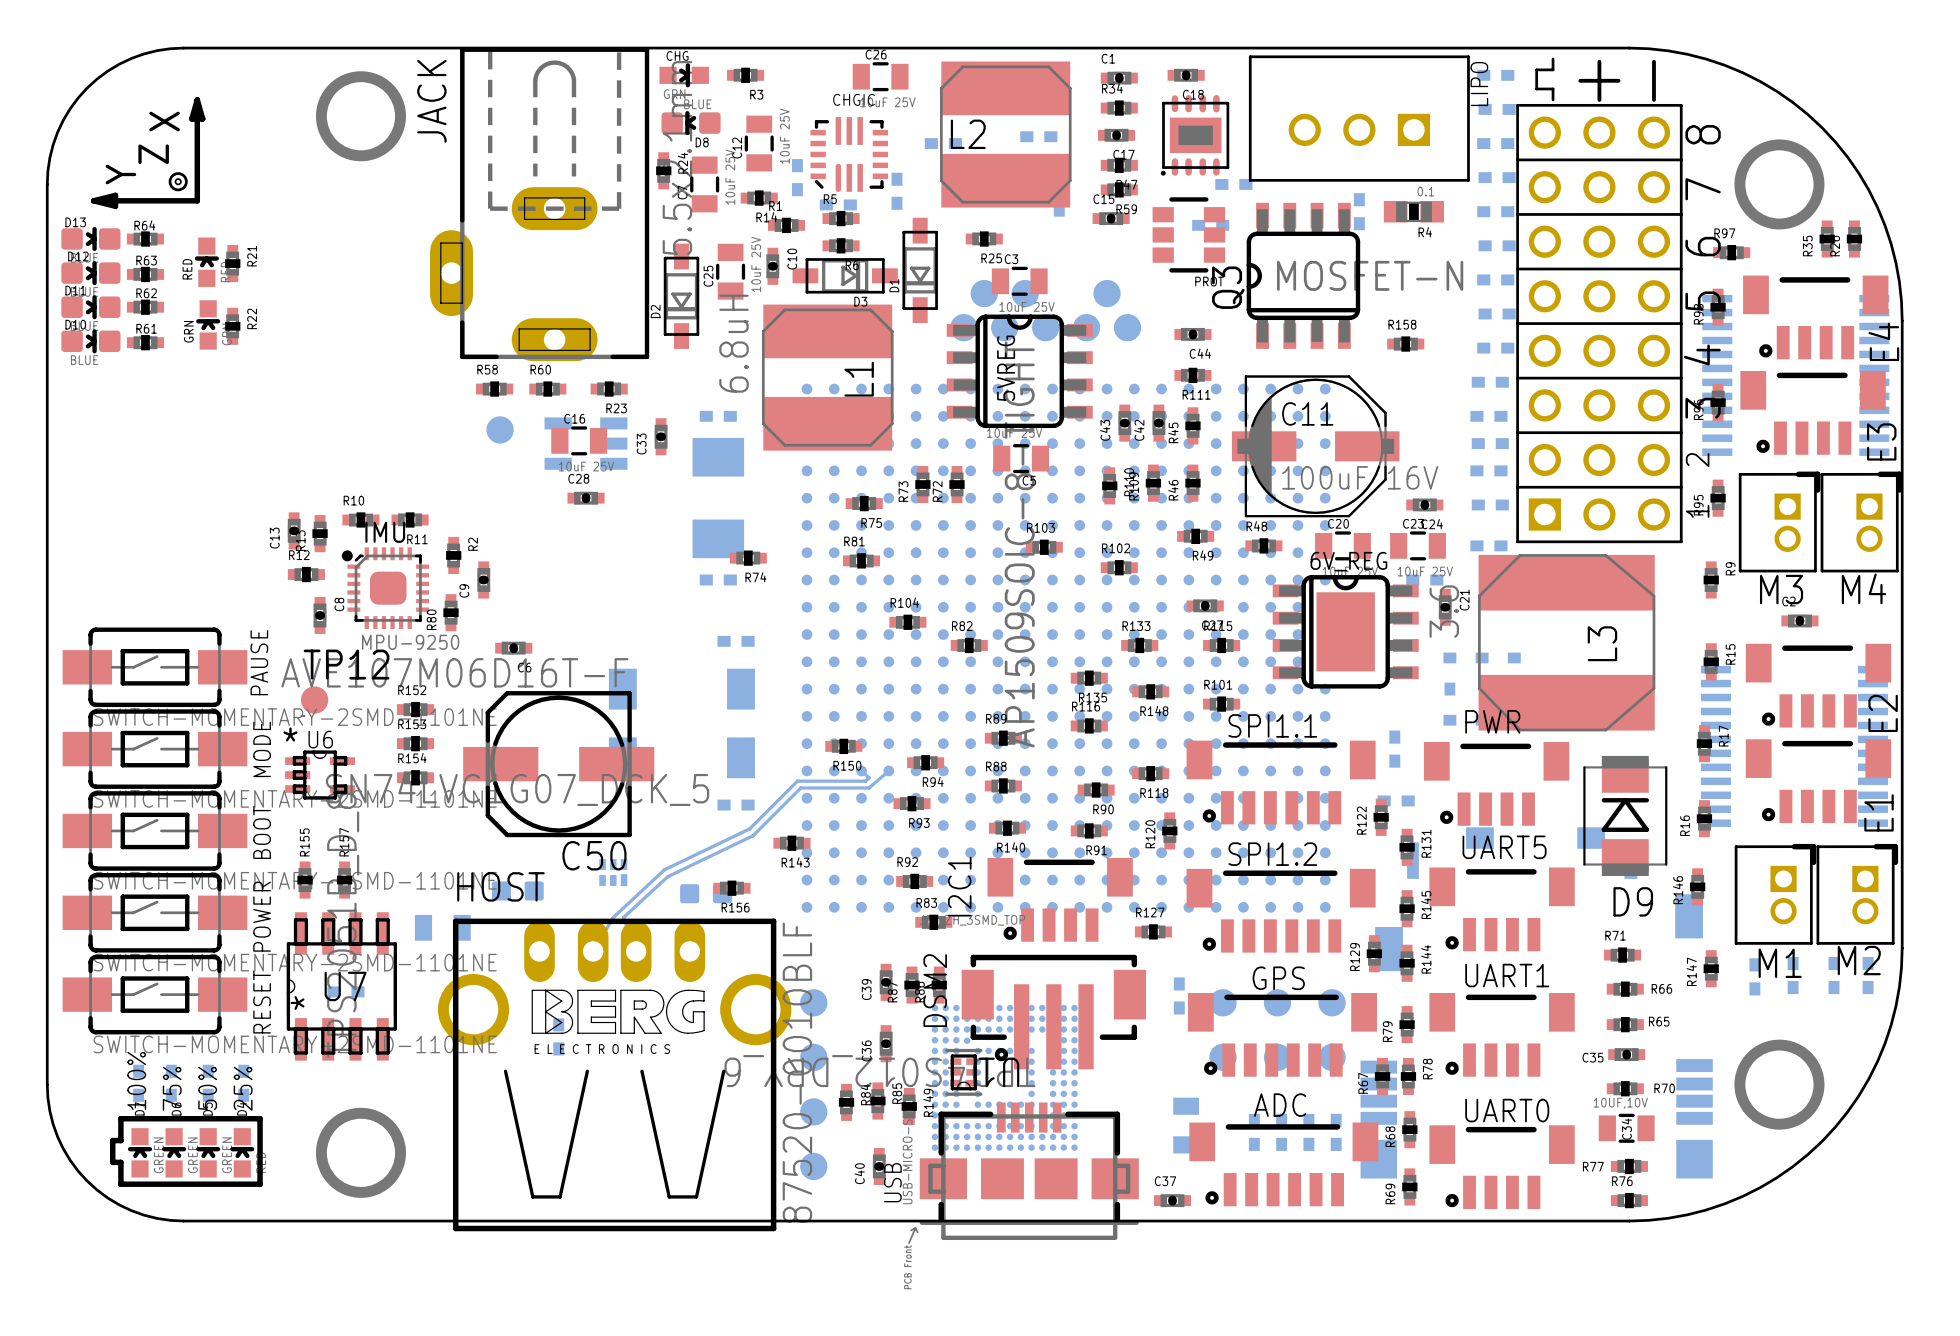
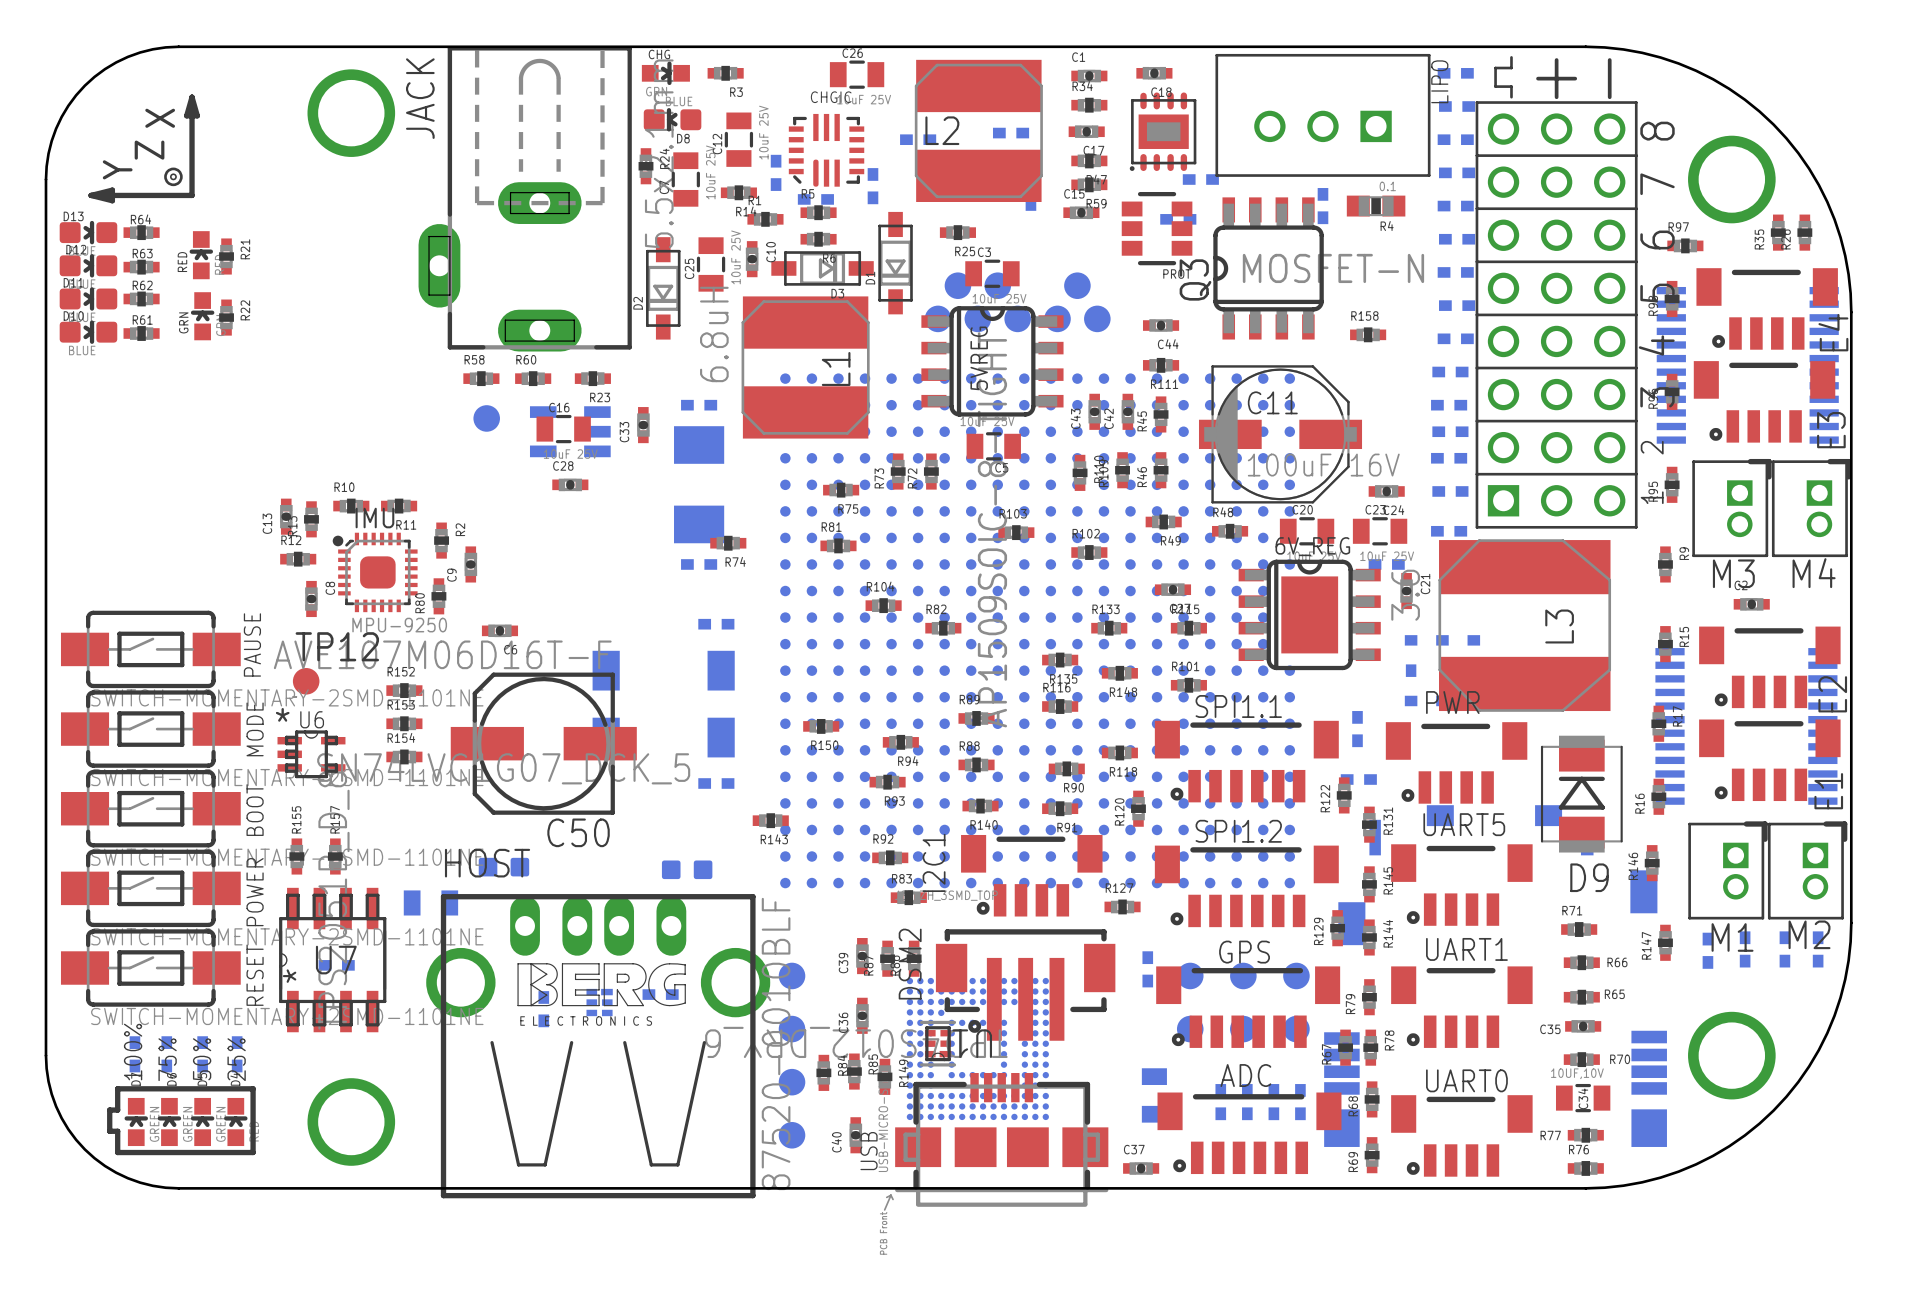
bottom track: (861, 770) (869, 777) (865, 781) (797, 781) (749, 828) (664, 869) (613, 917) (593, 951) -> none
bottom track: (888, 770) (869, 787) (800, 787) (753, 835) (667, 876) (623, 917) (636, 951) -> none
part rotation: 0° (613, 872) -> 90° counterclockwise (599, 1002)
part position: (613, 872) -> (599, 1002)
R156 side: top (731, 888) -> bottom (660, 994)

